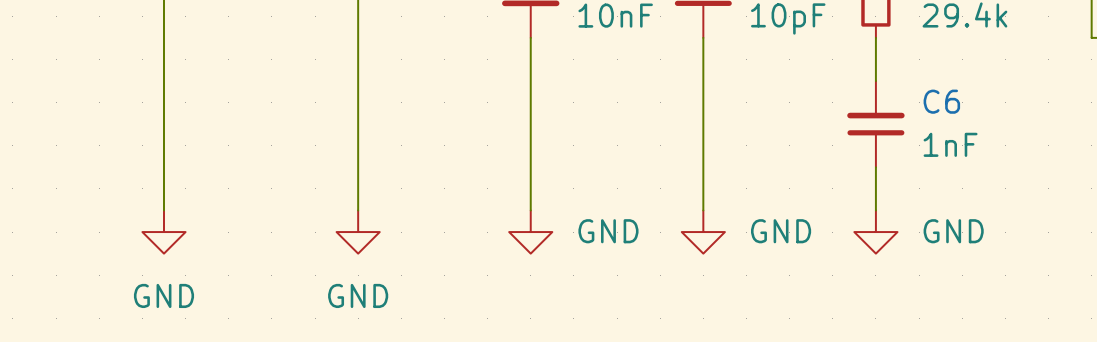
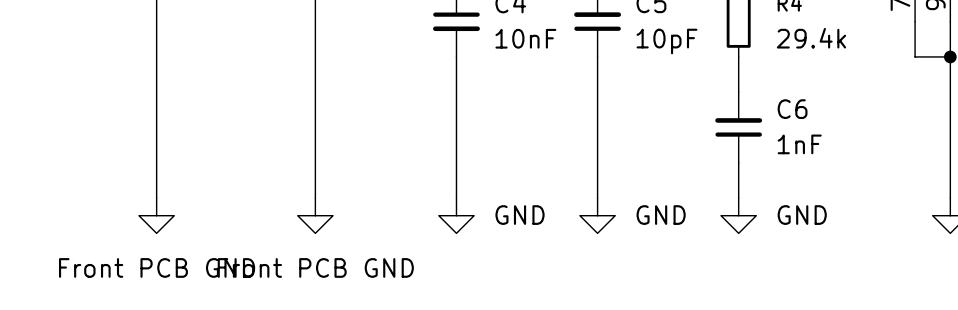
power symbol: GND (163, 232) -> Front PCB GND (156, 215)
power symbol: GND (358, 232) -> Front PCB GND (315, 215)

